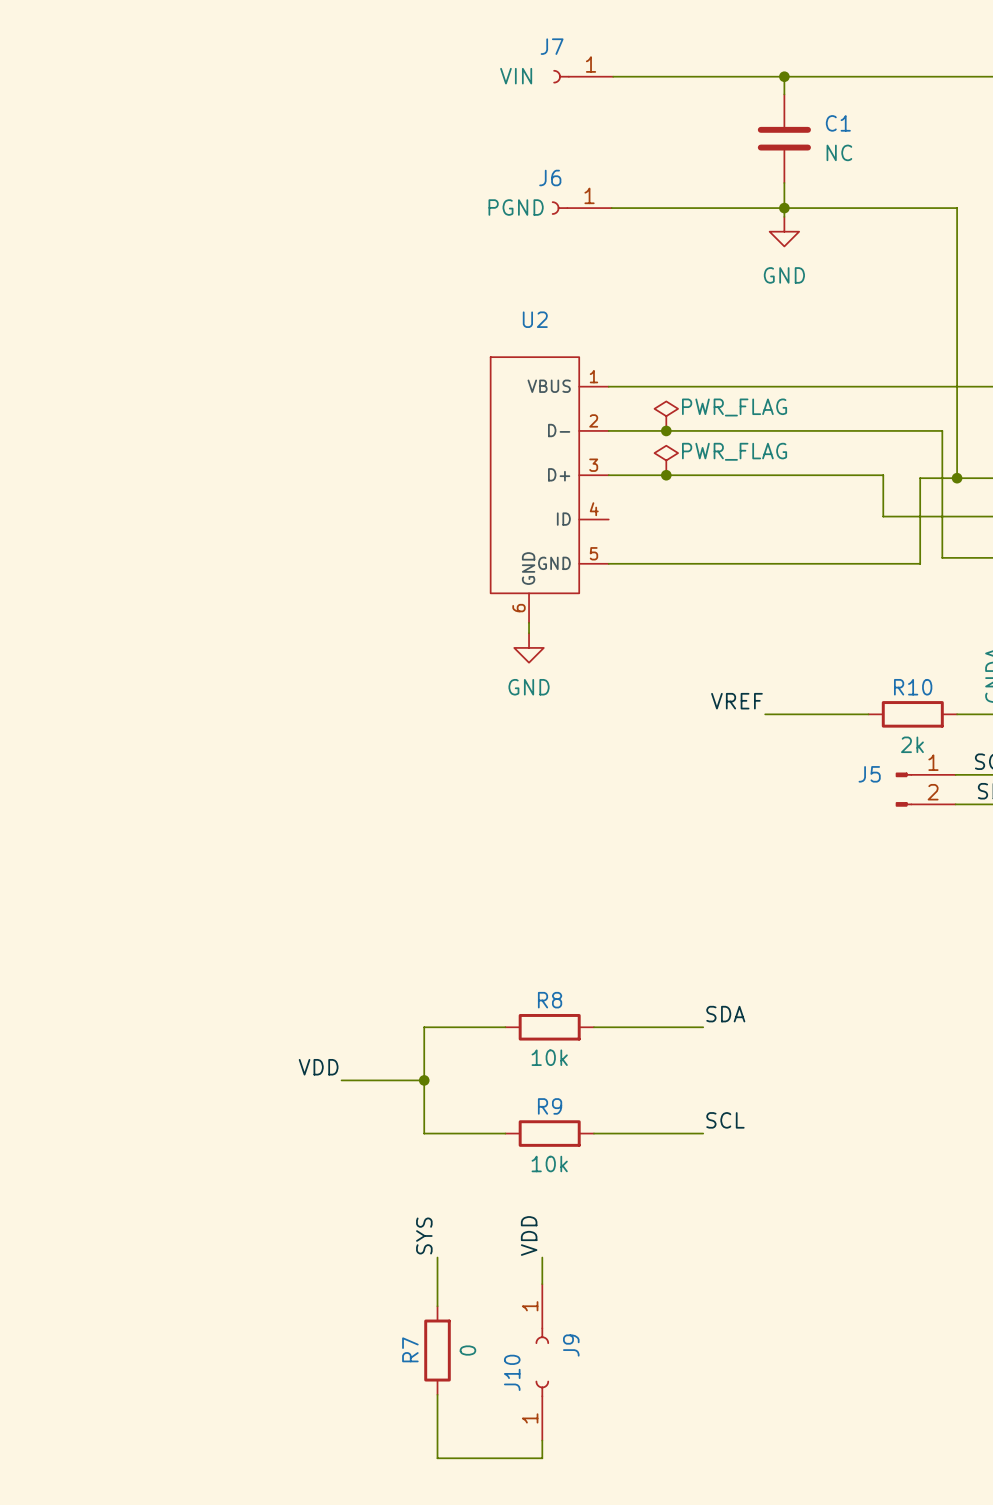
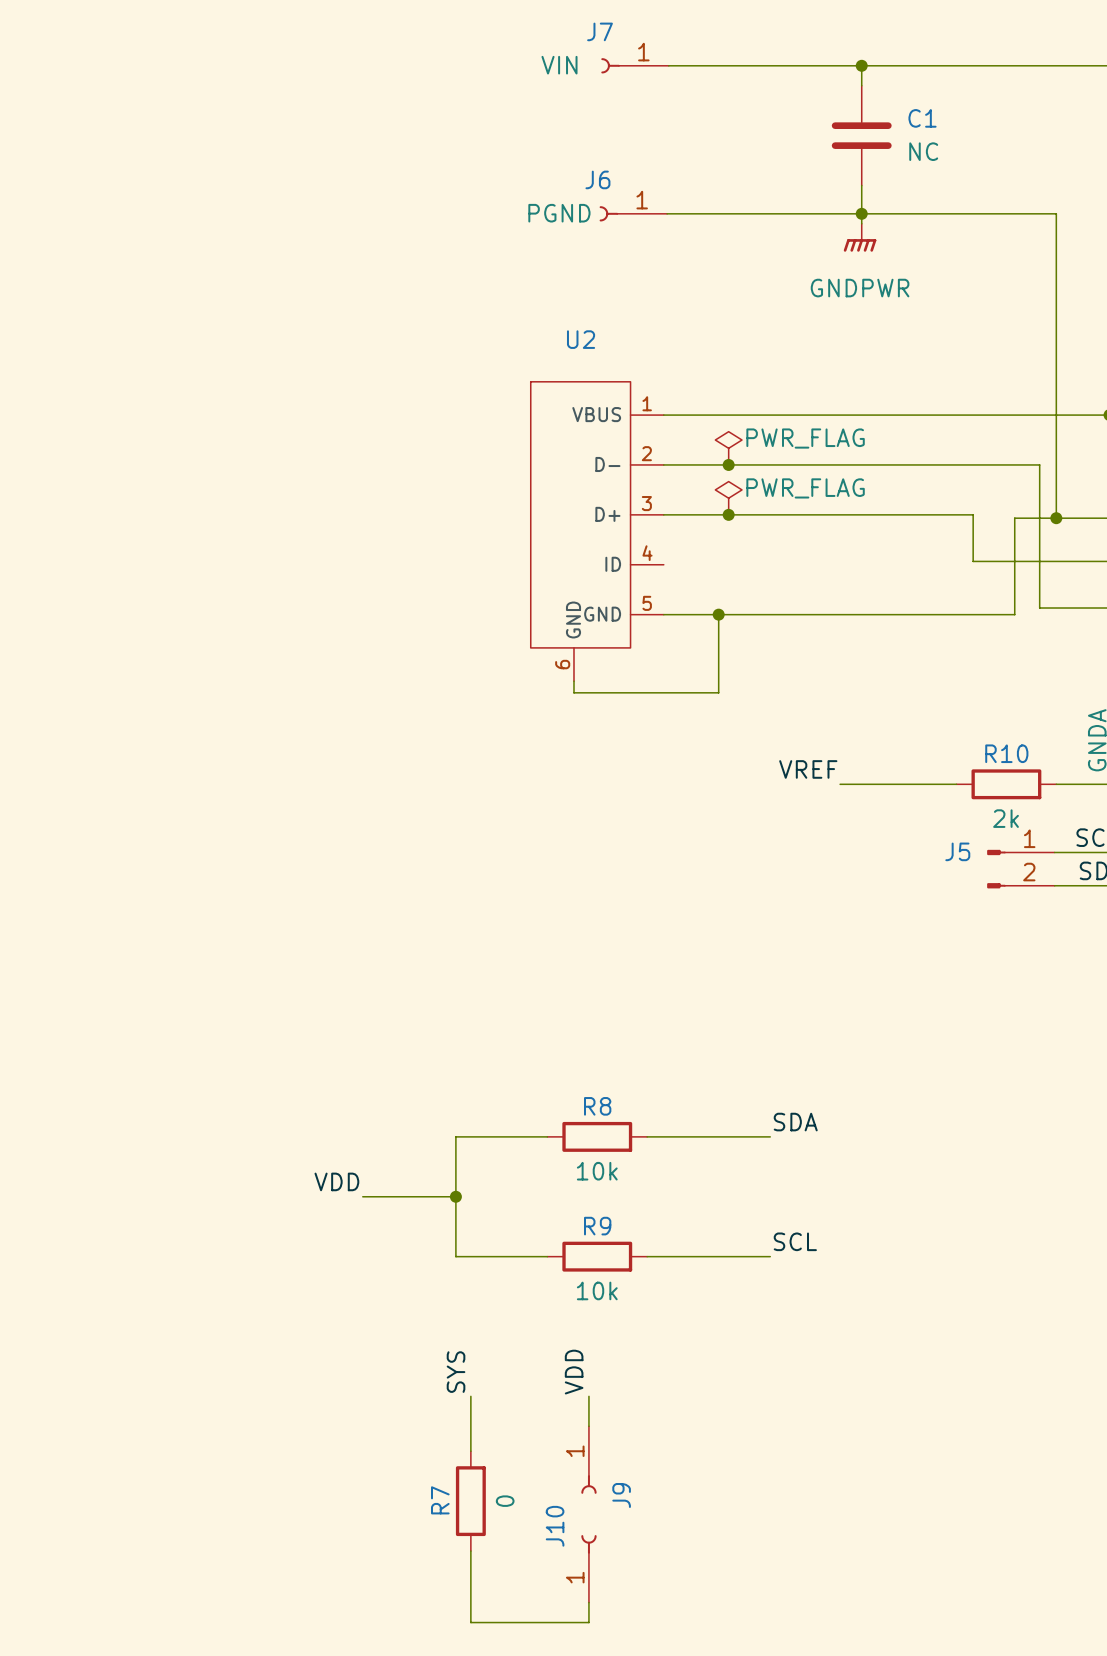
power symbol: GND (784, 231) -> GNDPWR (860, 237)
wire: none -> (718, 614) (718, 692) (573, 692)
junction: none -> (718, 614)
power symbol: GND (529, 647) -> none

